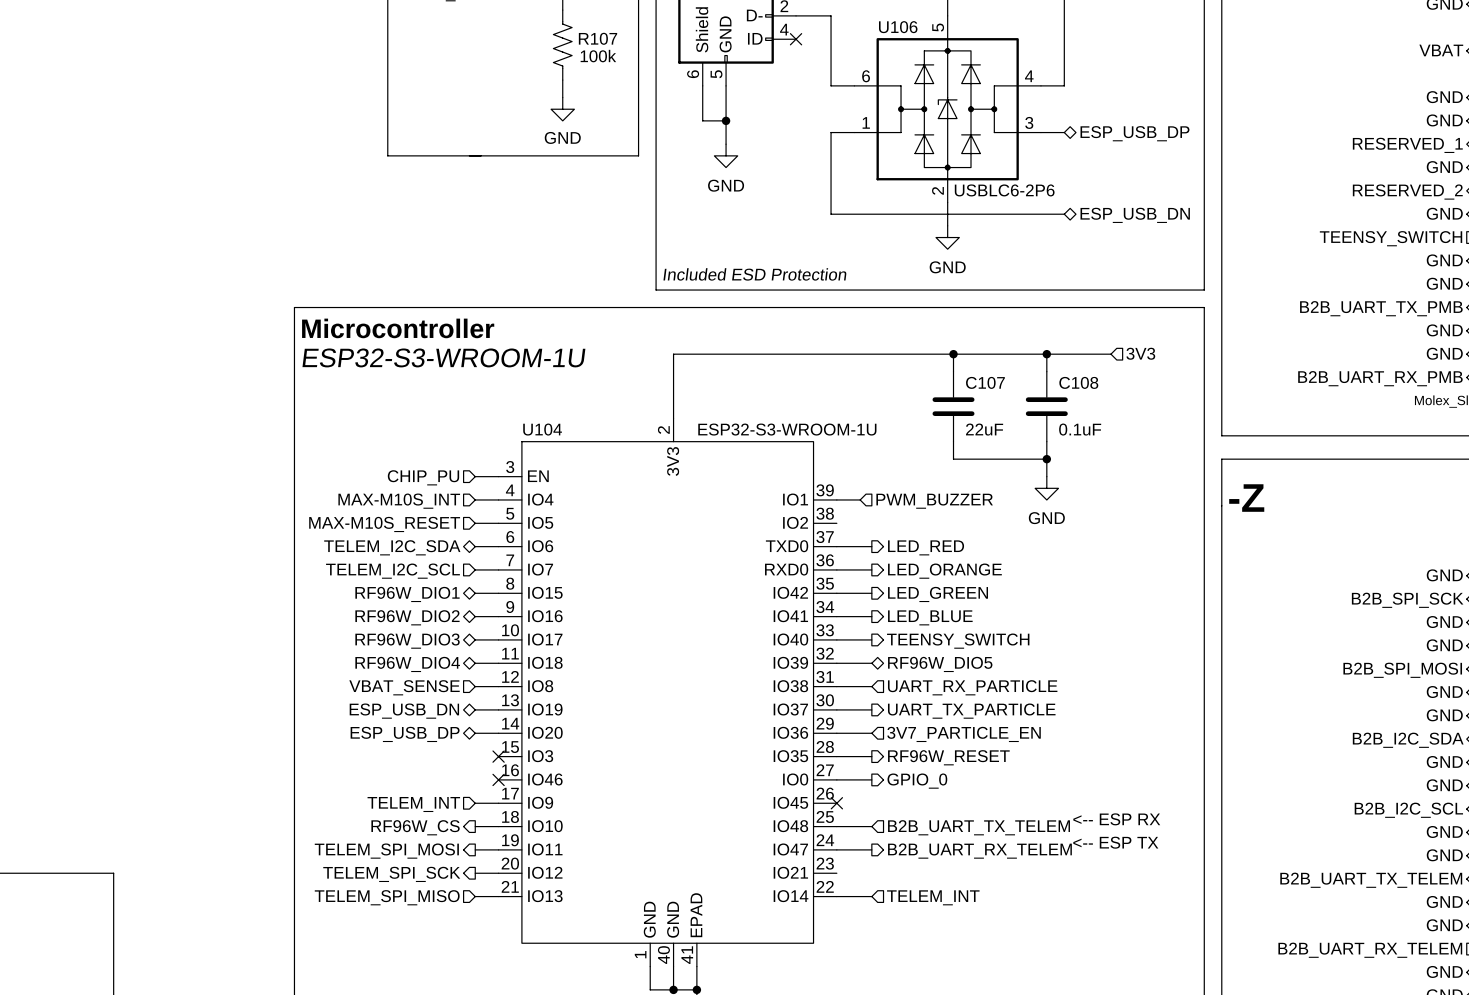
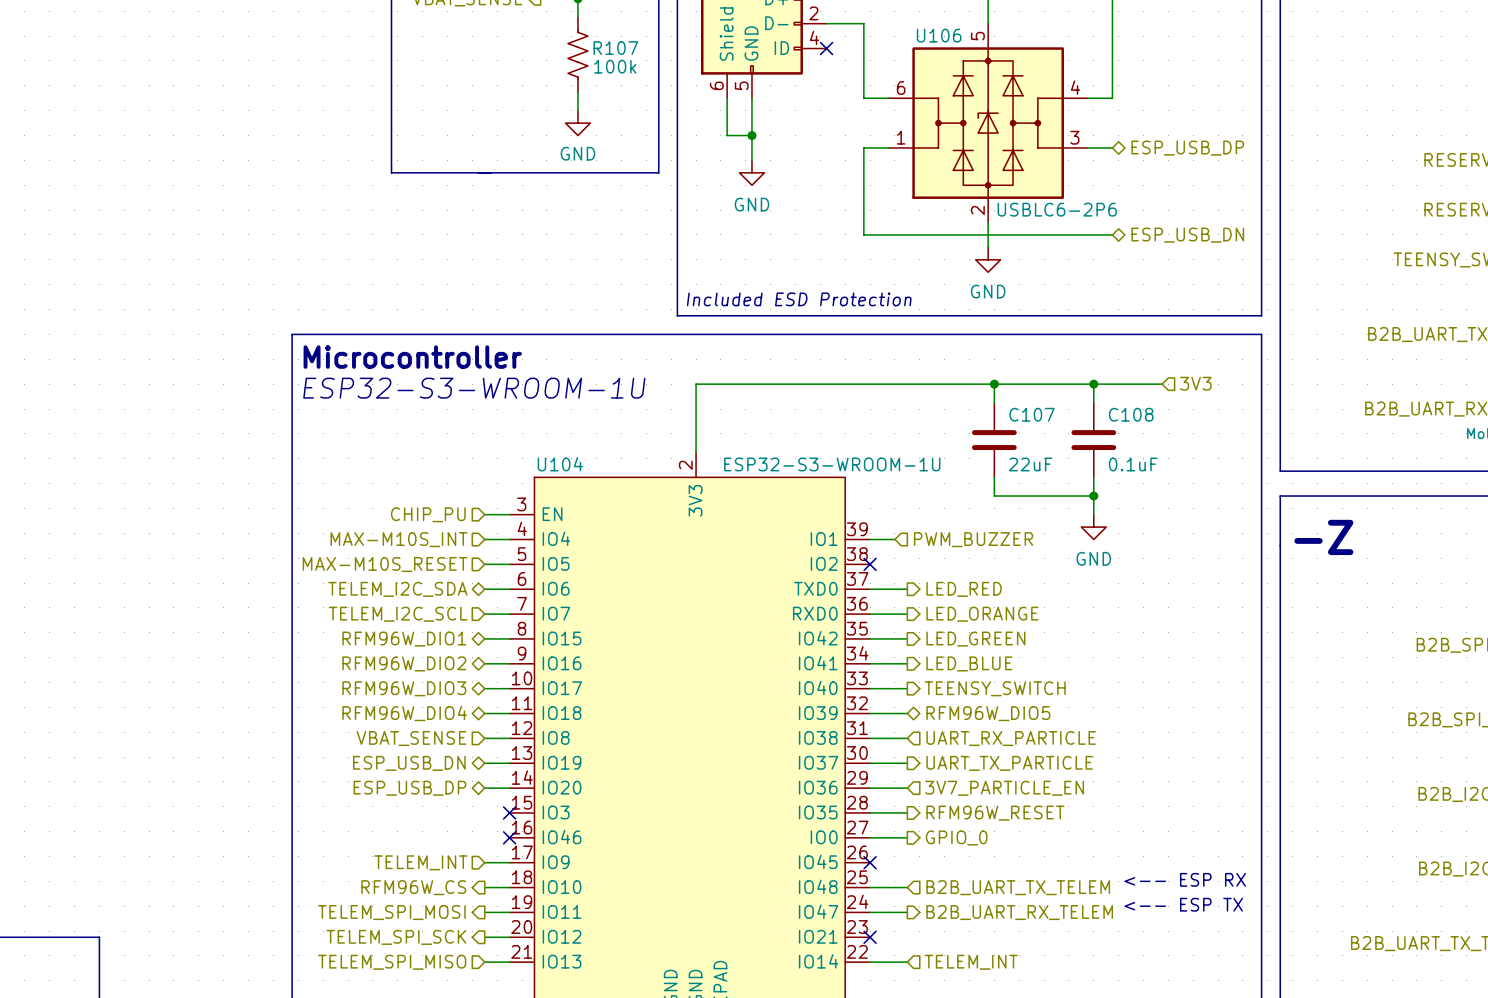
no-connect mark: none -> (870, 564)
hierarchical label: RF96W_DIO1 (407, 594) -> RFM96W_DIO1 (404, 639)
hierarchical label: RF96W_DIO2 (407, 617) -> RFM96W_DIO2 (404, 663)
hierarchical label: RF96W_DIO3 (407, 641) -> RFM96W_DIO3 (404, 688)
hierarchical label: RF96W_DIO4 (407, 664) -> RFM96W_DIO4 (404, 713)
hierarchical label: RF96W_DIO5 (940, 664) -> RFM96W_DIO5 (988, 713)
hierarchical label: RF96W_RESET (948, 757) -> RFM96W_RESET (995, 813)
hierarchical label: RF96W_CS (415, 827) -> RFM96W_CS (413, 887)
no-connect mark: none -> (870, 937)

